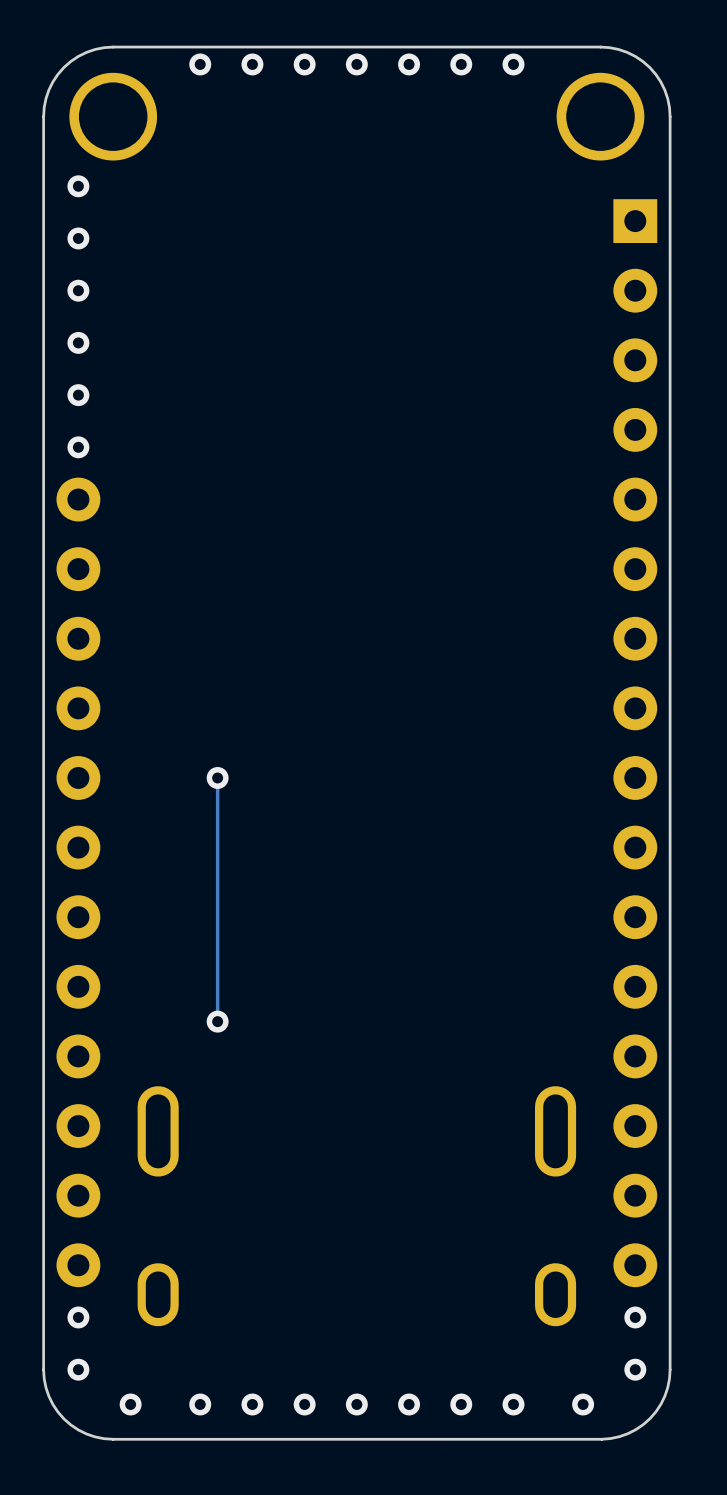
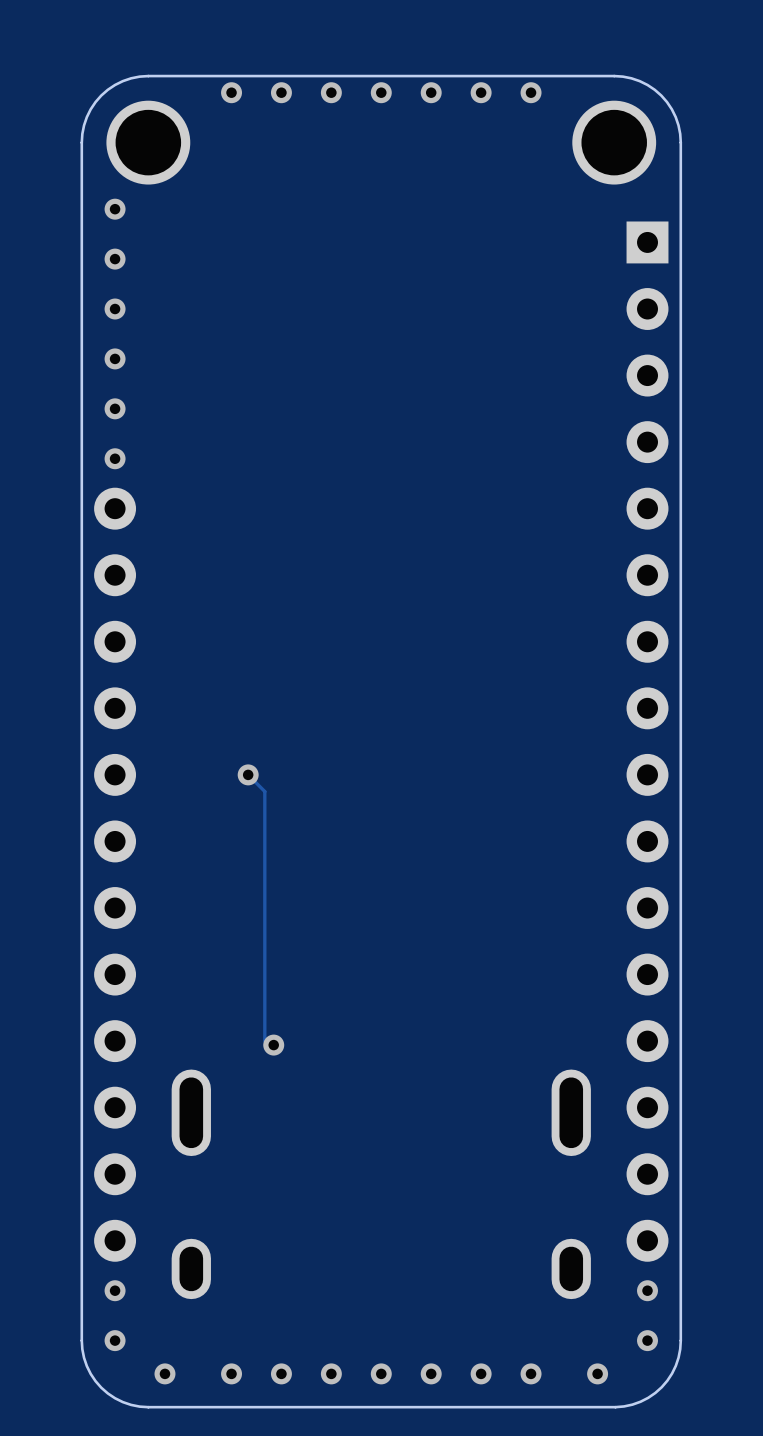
track: (217, 777) (217, 1021) -> (248, 774) (264, 791) (264, 1041)
via position: (217, 1021) -> (273, 1045)

